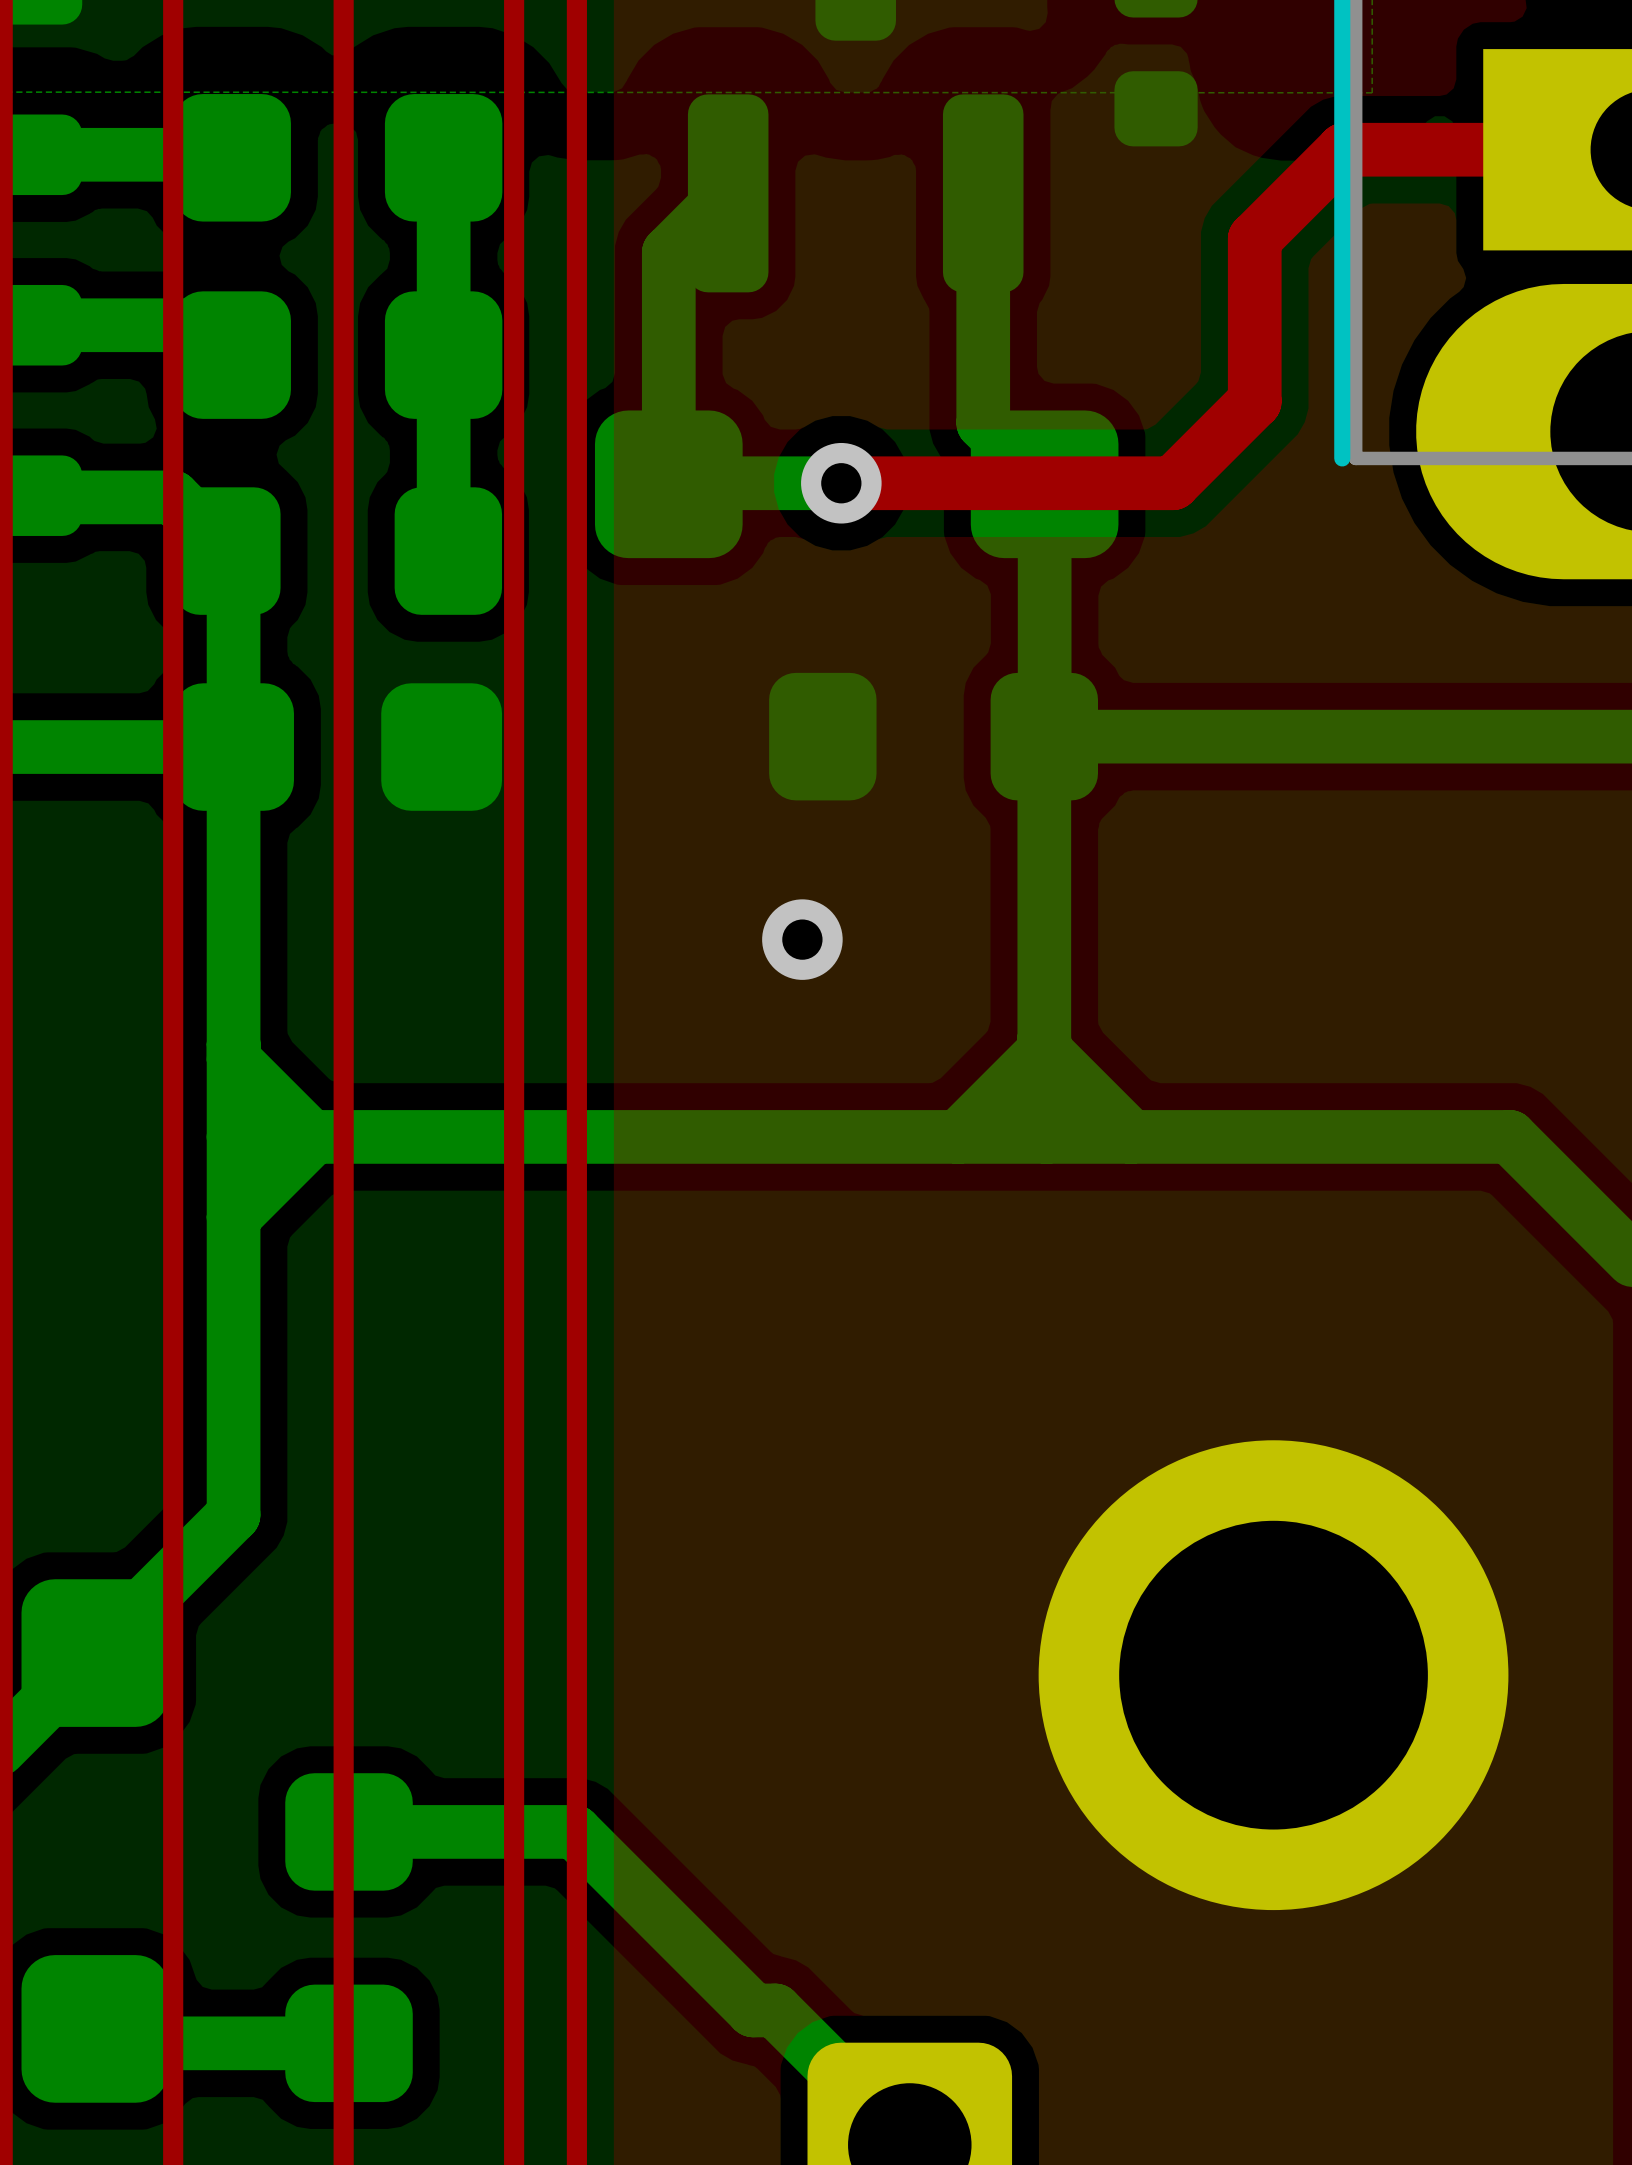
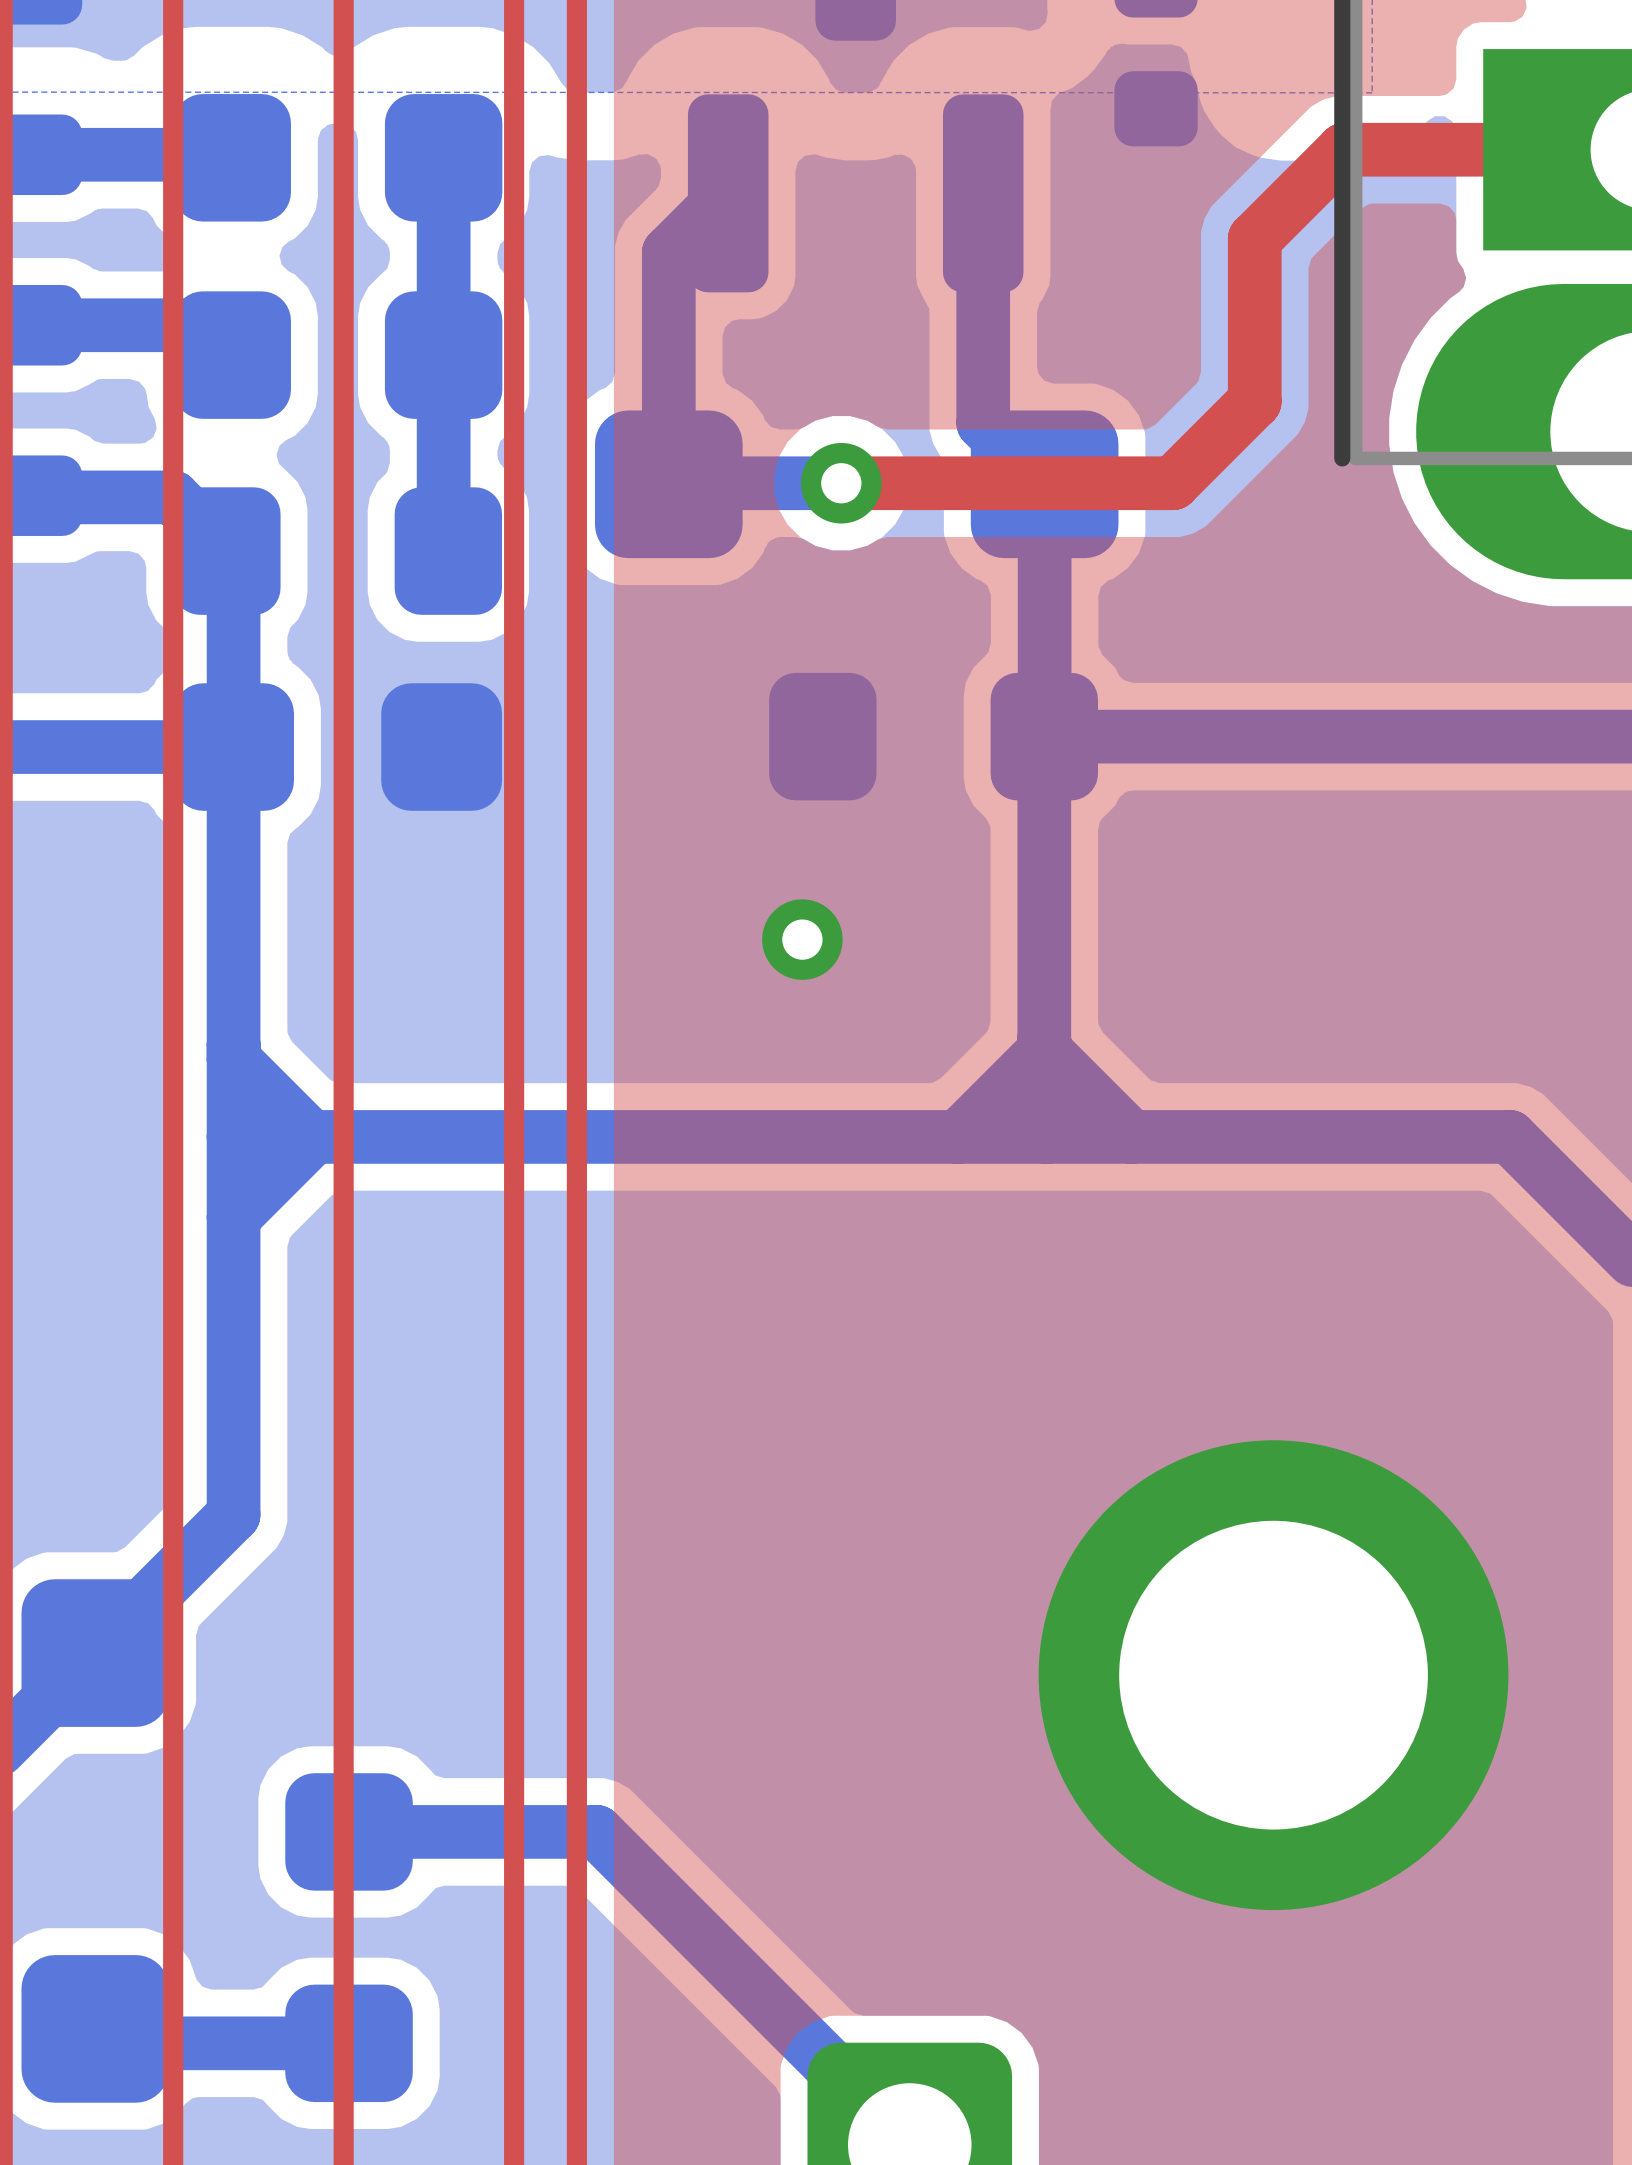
bottom track: (574, 1831) (753, 2010) (775, 2010) -> (574, 1831) (596, 1831) (775, 2010)

